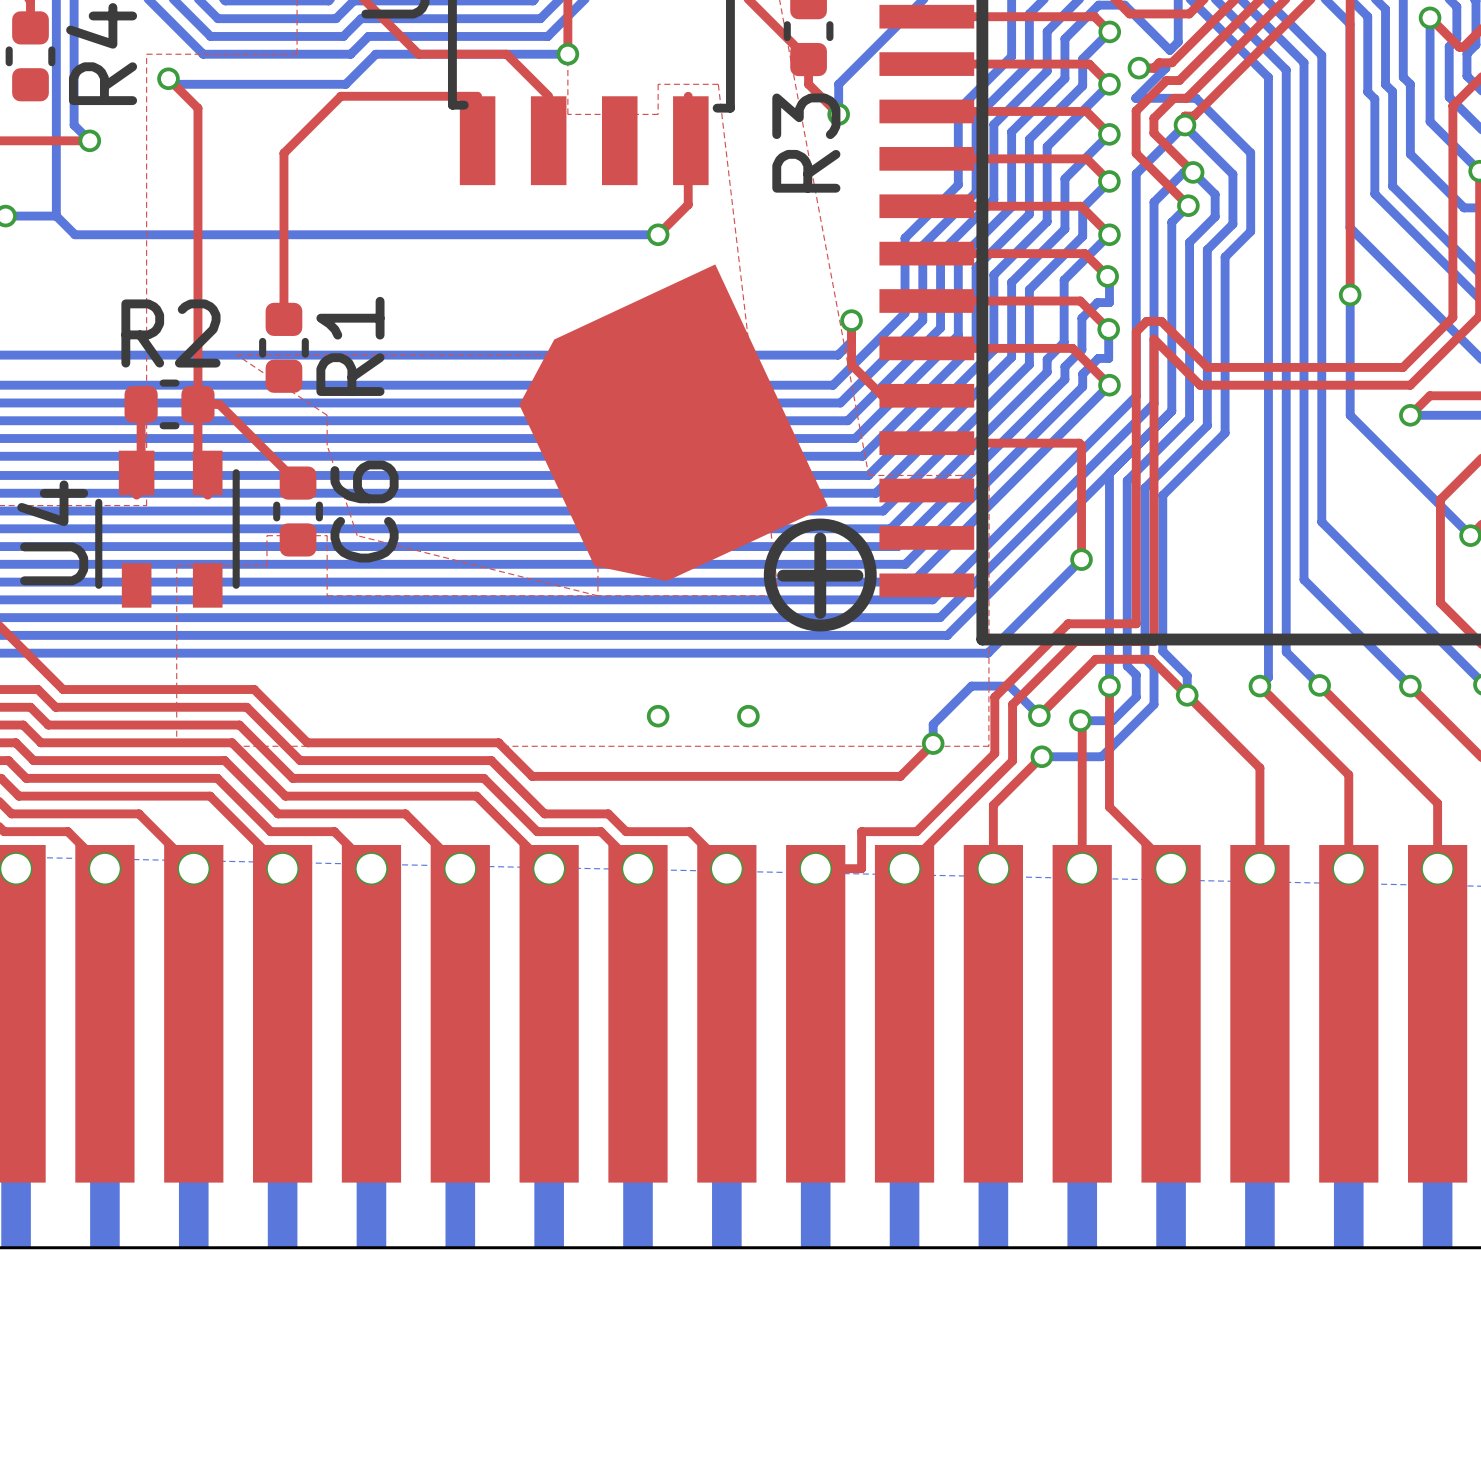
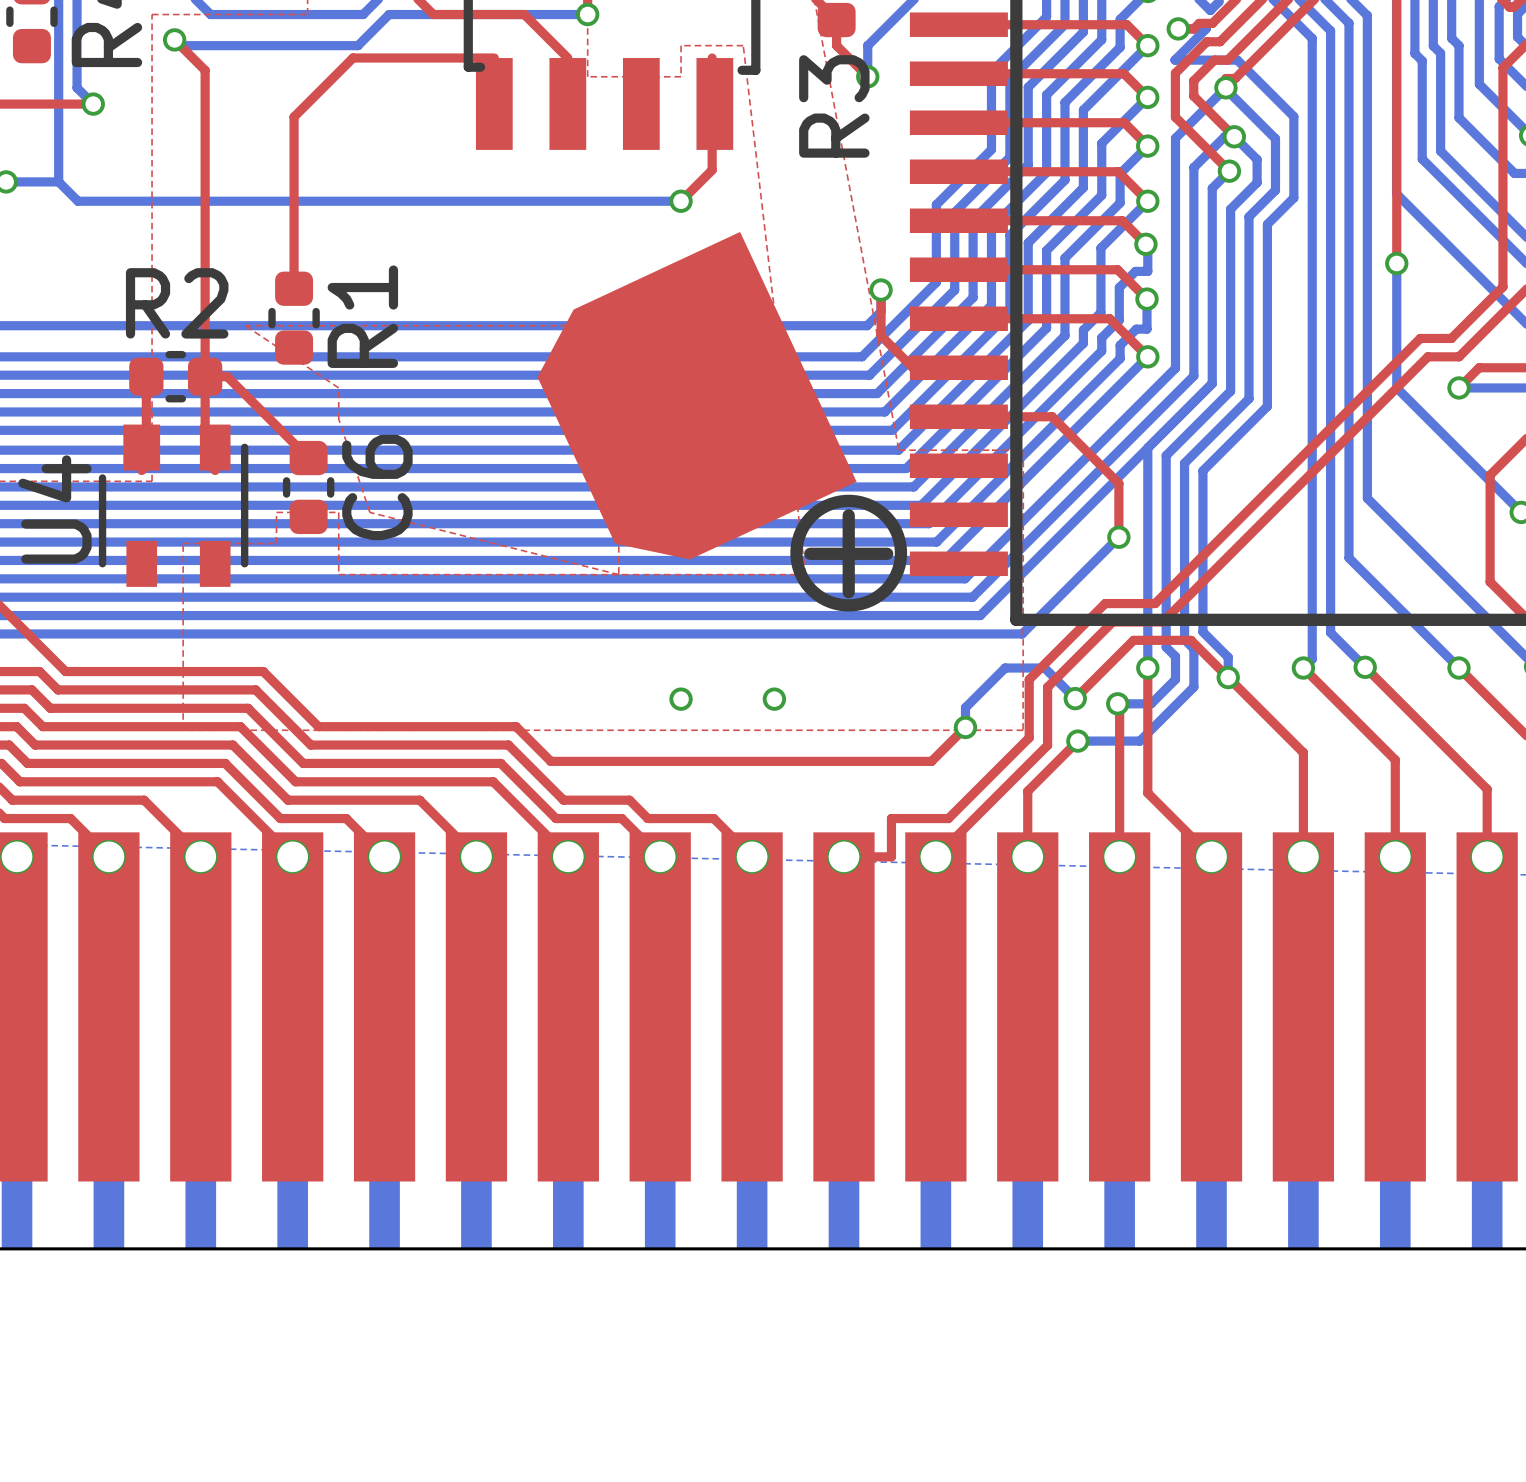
top track: (1372, 367) (1207, 367) (1161, 321) (1146, 321) (1136, 331) (1136, 623) (1116, 623) -> (1420, 338) (1155, 603)
top track: (1380, 385) (1200, 385) (1154, 339) (1154, 641) (1123, 641) -> (1427, 356) (1162, 621)
top track: (1016, 443) (1079, 443) (1081, 445) (1081, 507) -> (1052, 416) (1118, 483)

